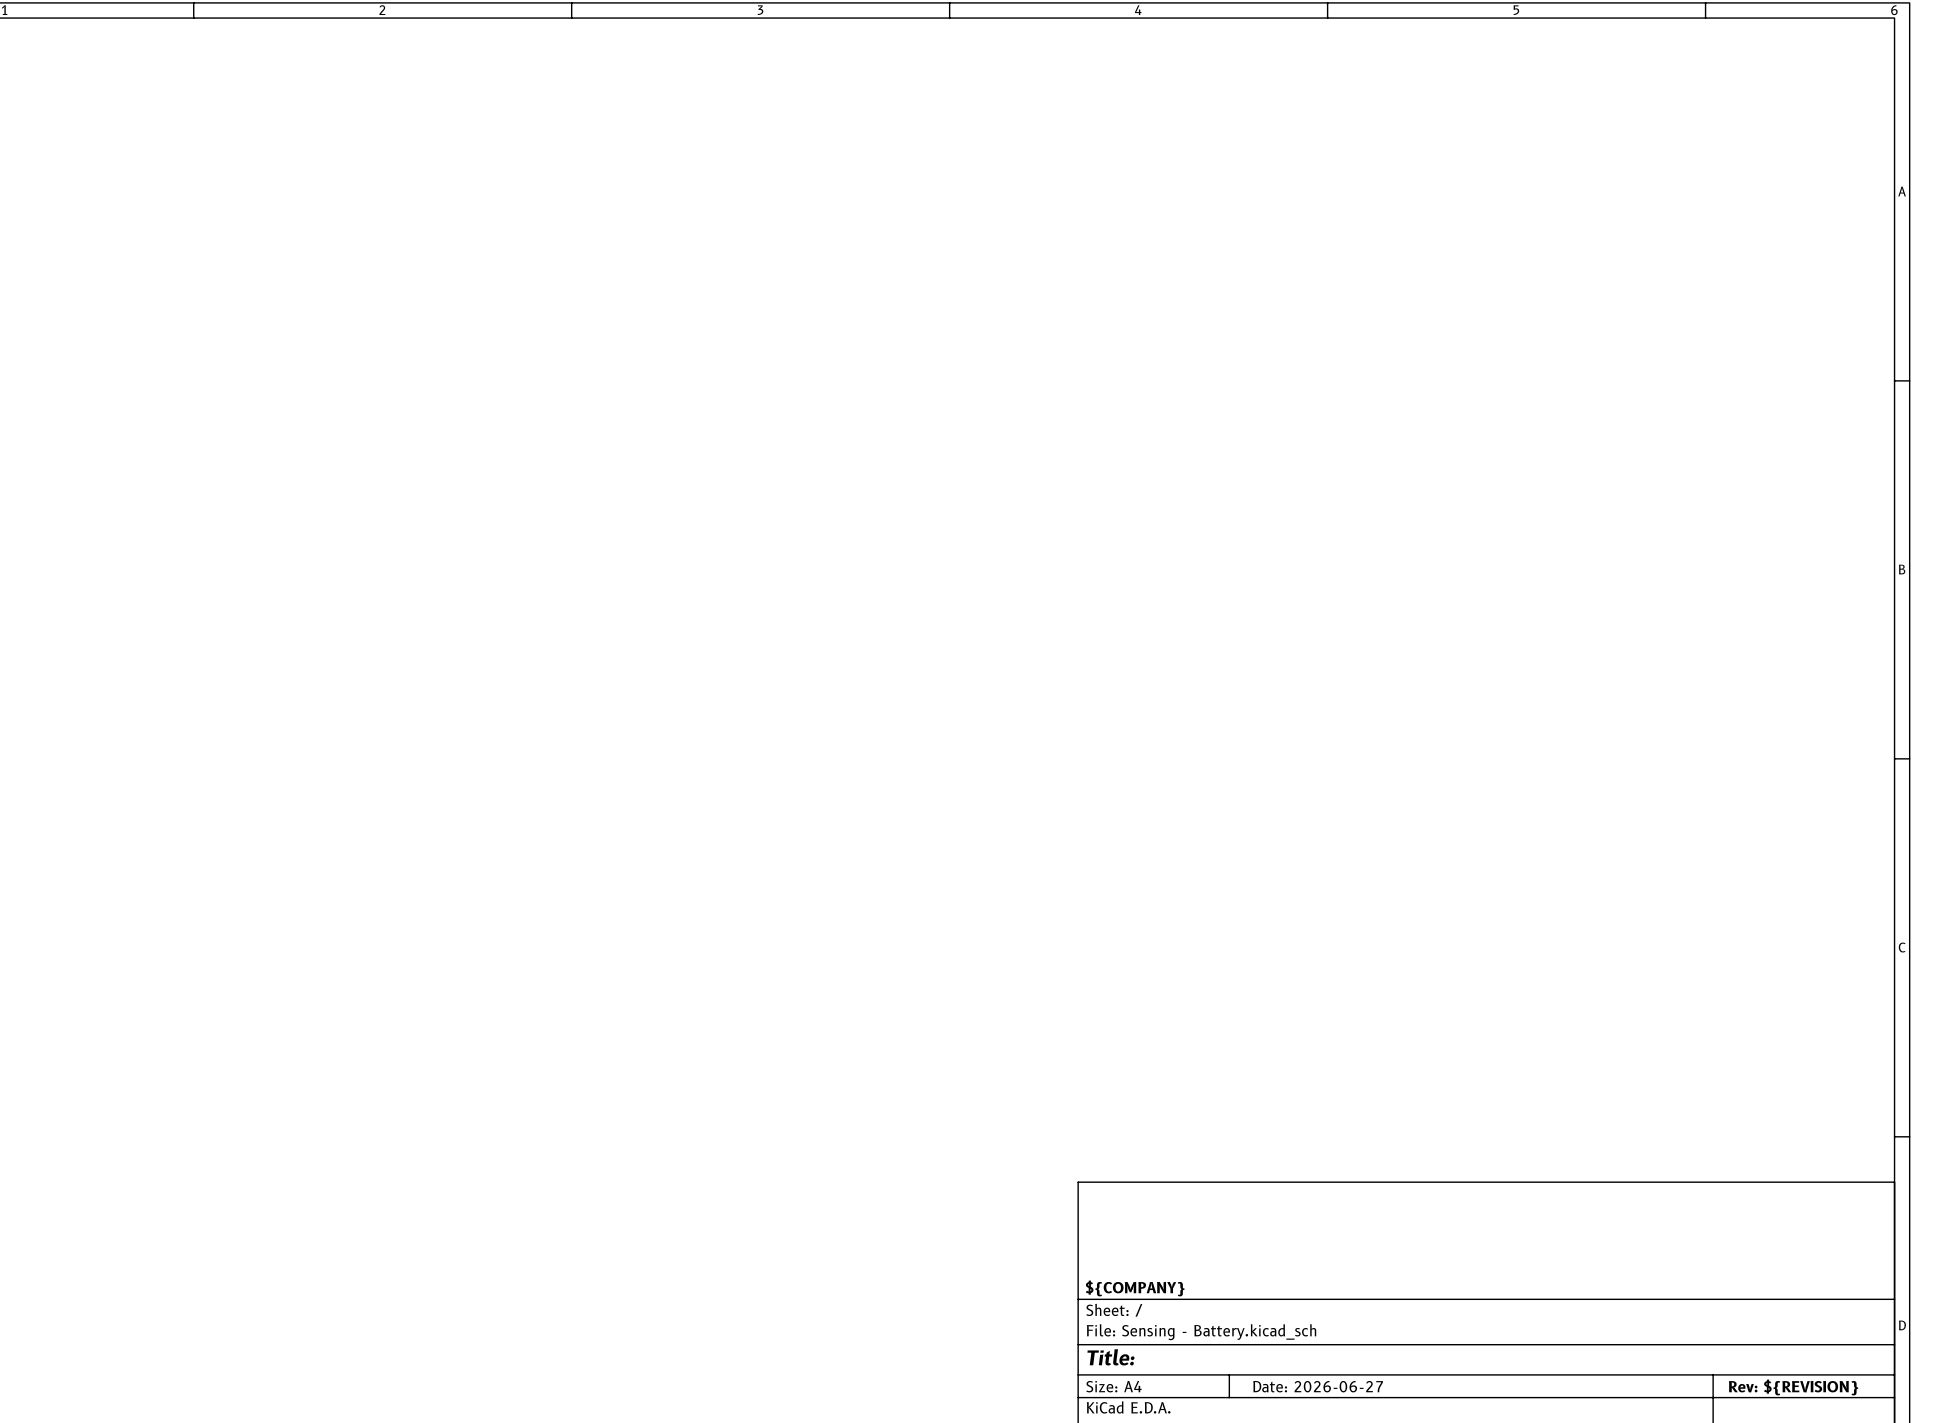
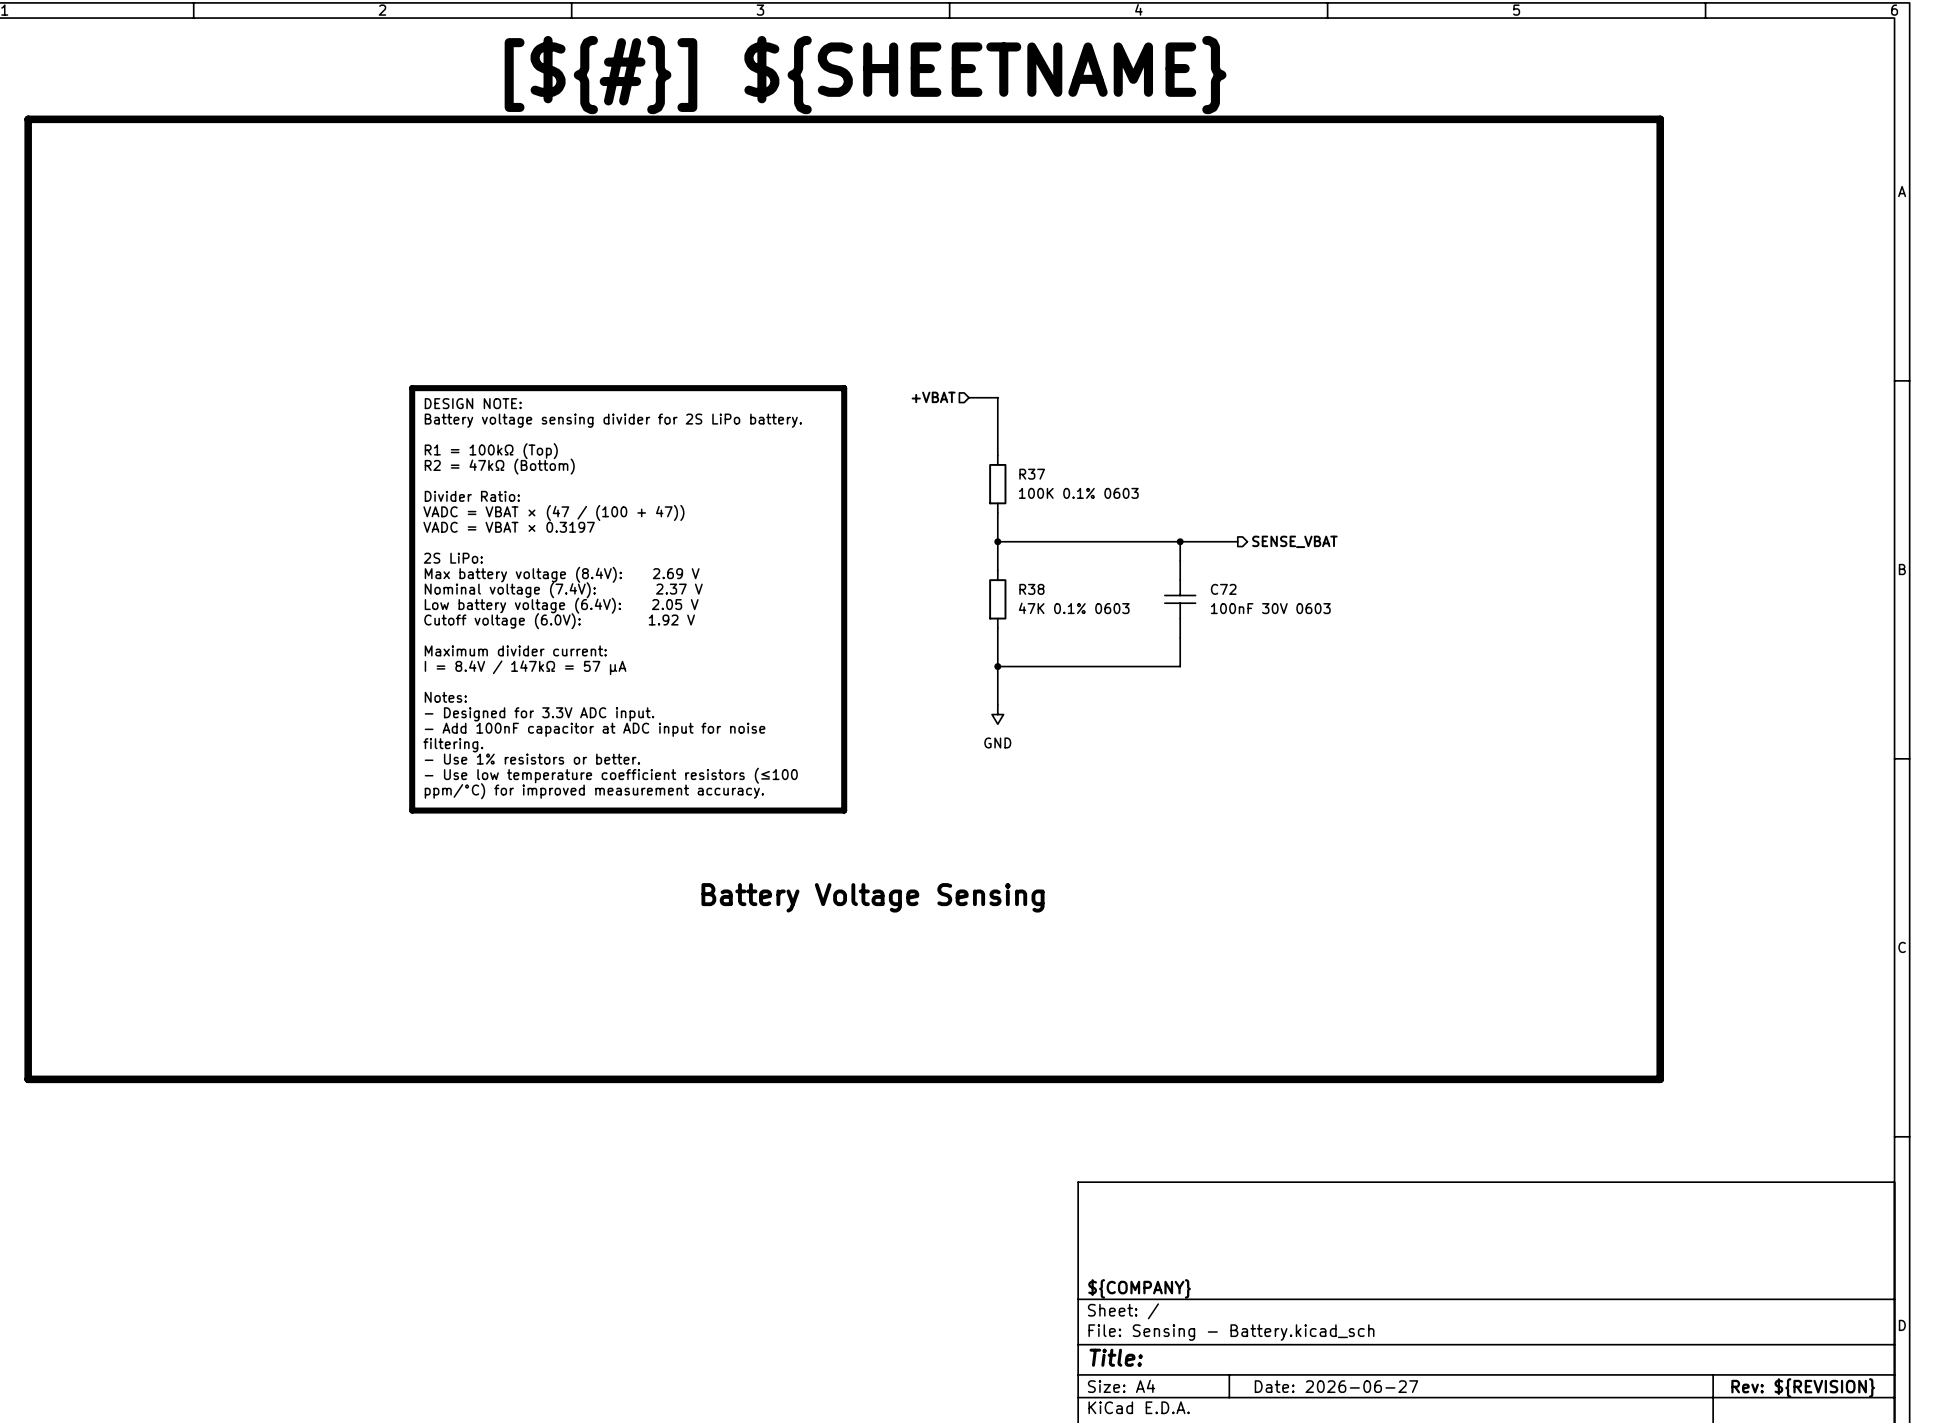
text: none -> [${#}] ${SHEETNAME} (865, 75)
line: none -> (28, 119) (1660, 119) (1660, 1079) (28, 1079) (28, 119)
line: none -> (412, 388) (844, 388) (844, 810) (412, 810) (412, 388)
hierarchical label: none -> +VBAT (933, 397)
wire: none -> (968, 397) (997, 397) (997, 455)
text: none -> DESIGN NOTE: (473, 403)
text: none -> Battery voltage sensing divider for 2S LiPo battery. (613, 420)
text: none -> R1 = 100kΩ (Top) (491, 451)
text: none -> R2 = 47kΩ (Bottom) (499, 466)
R37: none -> 100K 0.1% 0603 (997, 484)
text: none -> Divider Ratio: (472, 496)
text: none -> VADC = VBAT × (47 / (100 + 47)) (553, 512)
wire: none -> (997, 512) (997, 570)
text: none -> VADC = VBAT × 0.3197 (509, 527)
wire: none -> (997, 541) (1237, 541)
junction: none -> (997, 541)
wire: none -> (1180, 541) (1180, 560)
junction: none -> (1180, 541)
hierarchical label: none -> SENSE_VBAT (1294, 541)
text: none -> 2S LiPo: (453, 558)
text: none -> Max battery voltage (8.4V): 2.69 V (562, 574)
text: none -> Nominal voltage (7.4V): 2.37 V (563, 590)
R38: none -> 47K 0.1% 0603 (997, 599)
C72: none -> 100nF 30V 0603 (1180, 599)
text: none -> Low battery voltage (6.4V): 2.05 V (561, 605)
text: none -> Cutoff voltage (6.0V): 1.92 V (559, 621)
wire: none -> (997, 628) (997, 704)
wire: none -> (1180, 637) (1180, 666) (997, 666)
text: none -> Maximum divider current: (515, 650)
junction: none -> (997, 666)
text: none -> I = 8.4V / 147kΩ = 57 µA (525, 667)
text: none -> Notes: (445, 697)
text: none -> - Designed for 3.3V ADC input. (539, 714)
power symbol: none -> GND (997, 714)
text: none -> - Add 100nF capacitor at ADC input for noise (595, 729)
text: none -> filtering. (453, 745)
text: none -> - Use 1% resistors or better. (532, 759)
text: none -> - Use low temperature coefficient resistors (≤100 (611, 775)
text: none -> ppm/°C) for improved measurement accuracy. (594, 791)
text: none -> Battery Voltage Sensing (872, 897)

